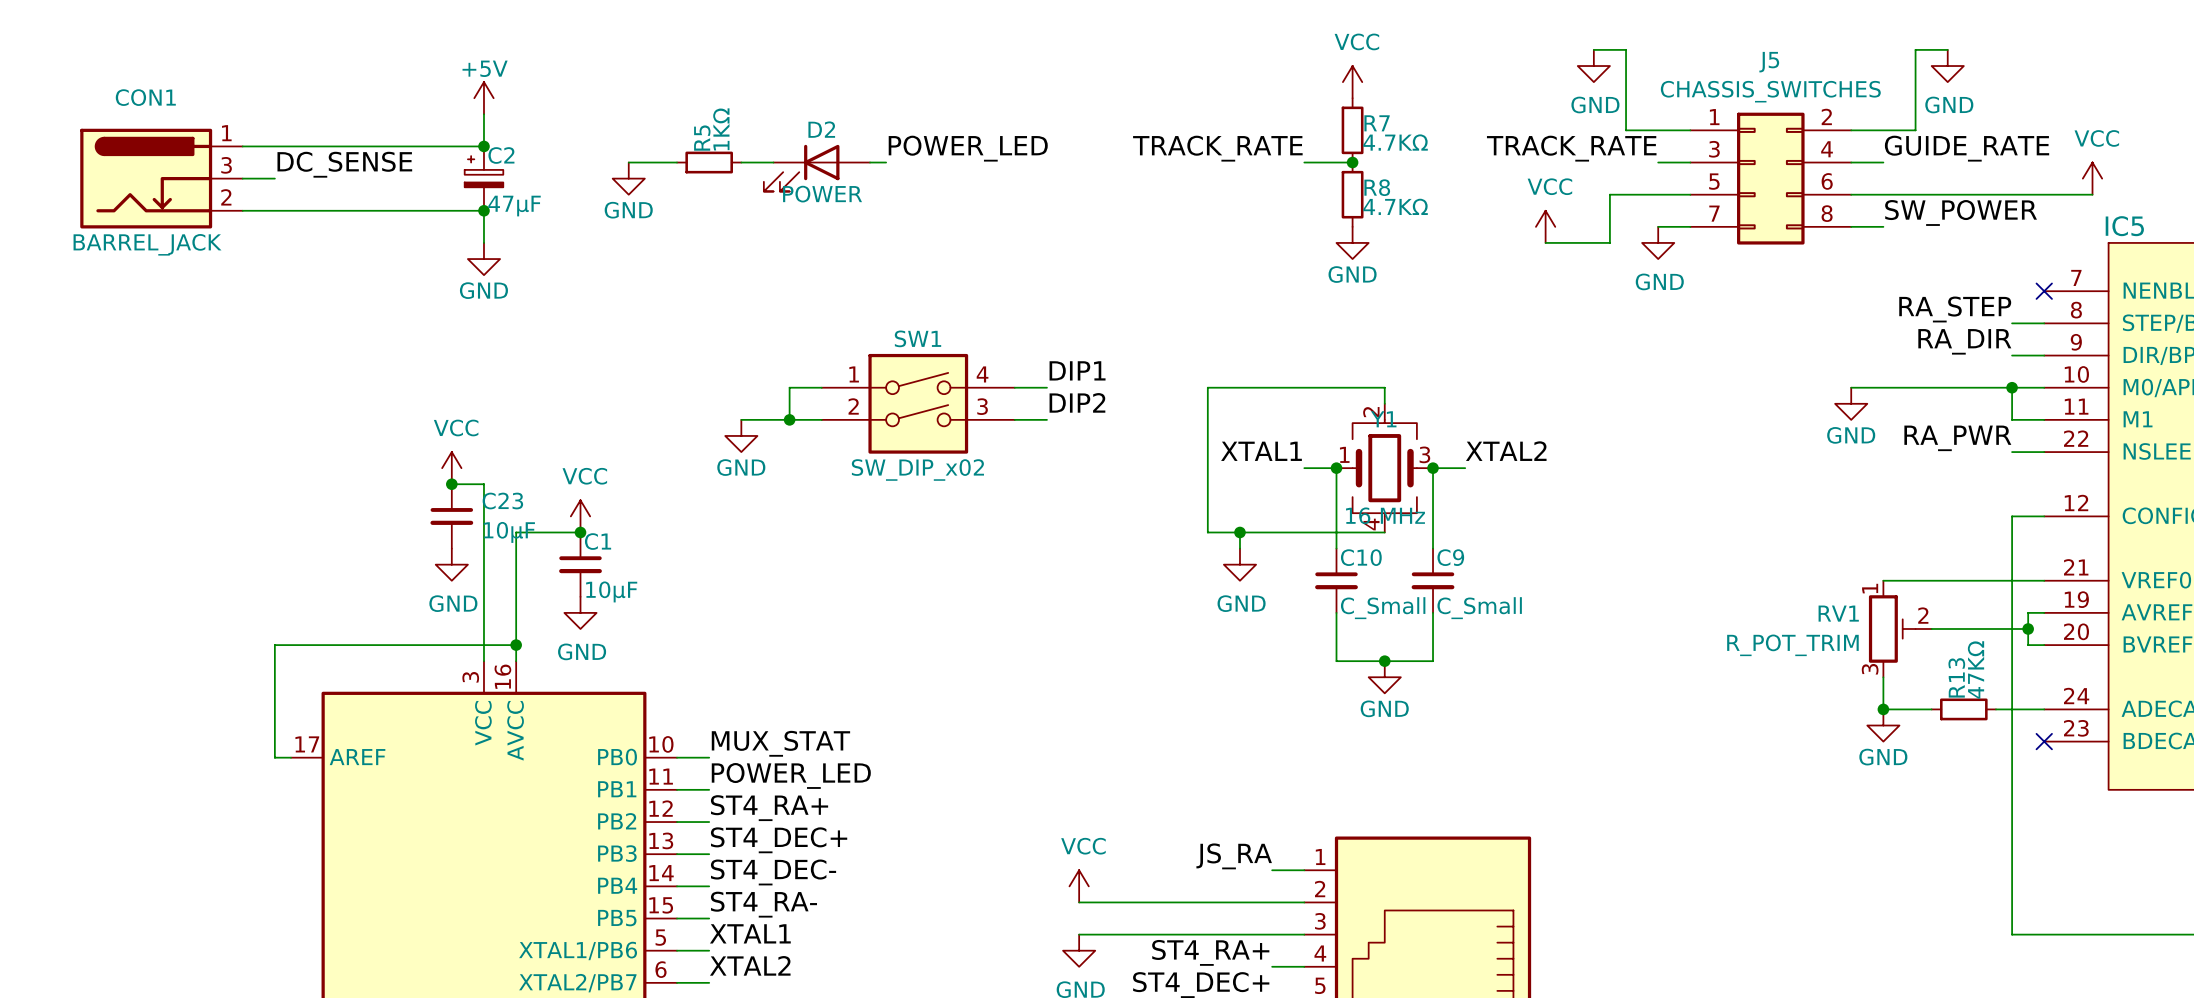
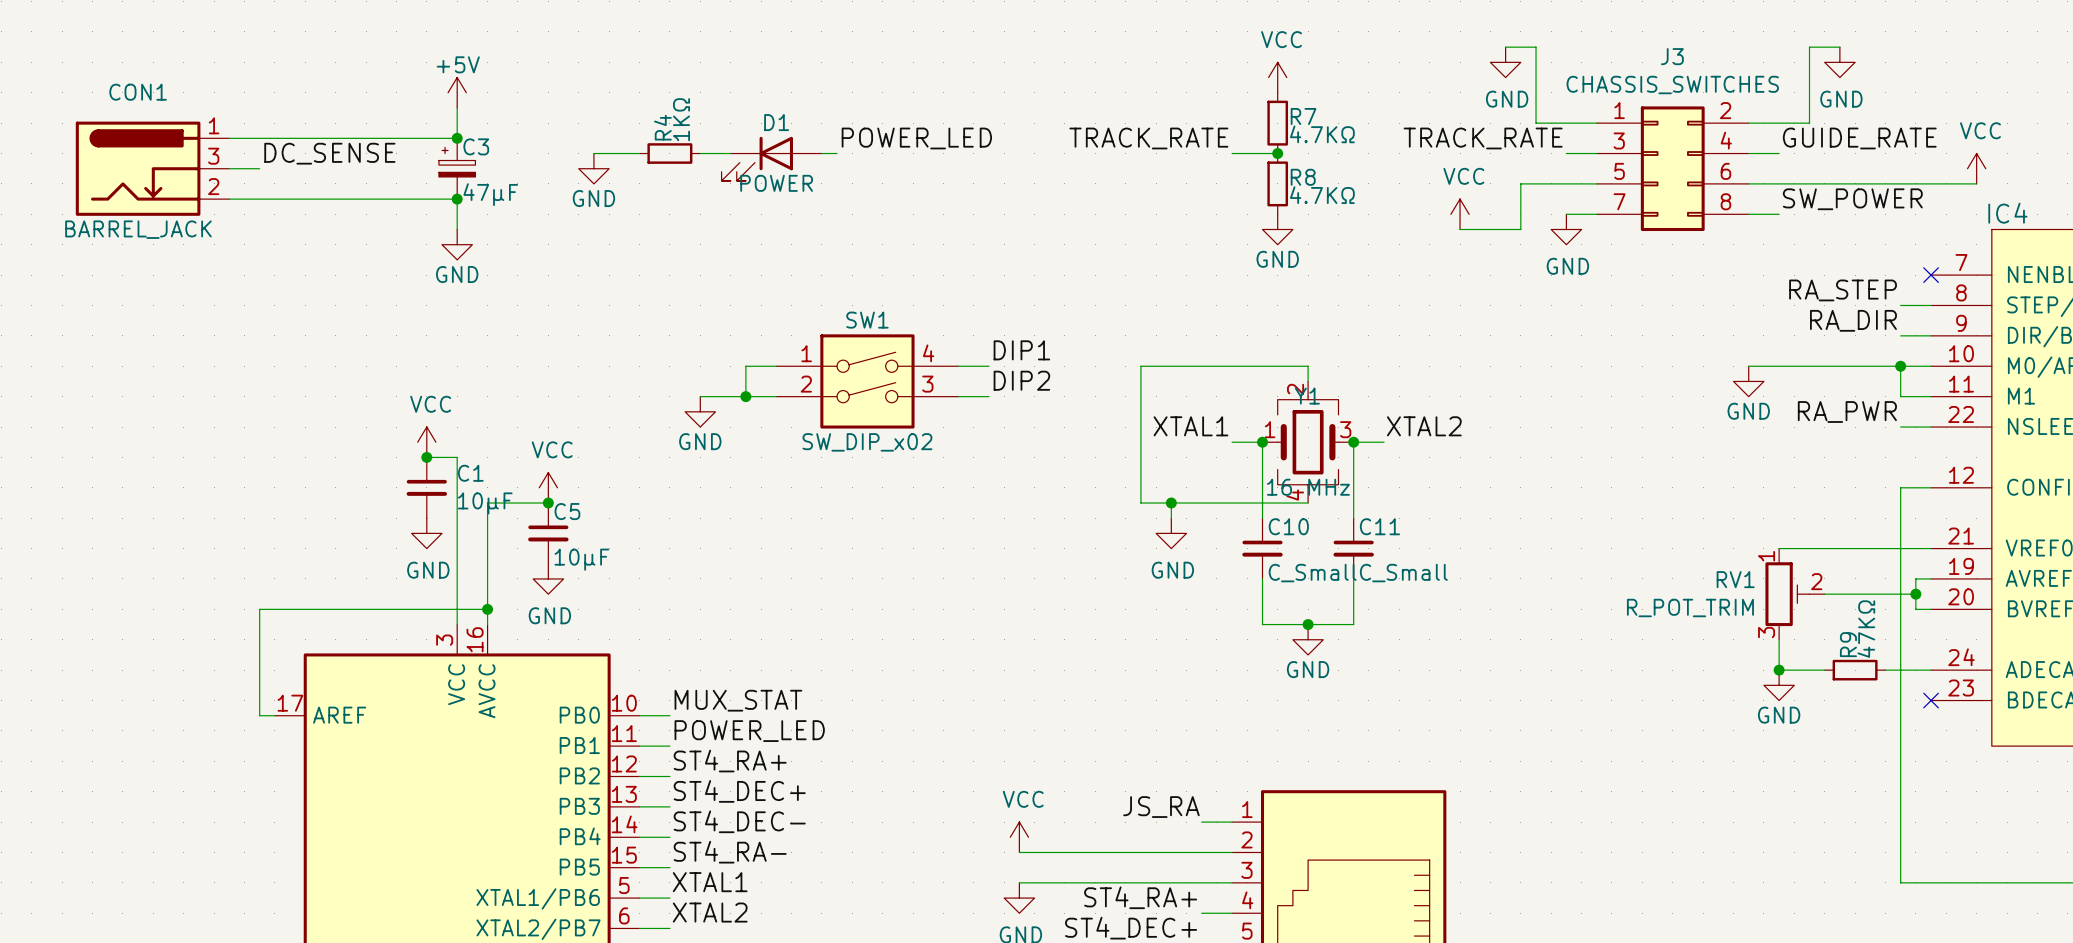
J5 name: J5 (1769, 62) -> J3 (1672, 56)
D2 name: D2 (821, 129) -> D1 (776, 122)
R5 name: R5 (702, 138) -> R4 (662, 127)
C2 name: C2 (501, 155) -> C3 (476, 146)
IC5 name: IC5 (2124, 226) -> IC4 (2007, 213)
C23 name: C23 (502, 501) -> C1 (470, 473)
C1 name: C1 (598, 541) -> C5 (567, 511)
C9 name: C9 (1450, 557) -> C11 (1379, 526)
R13 name: R13 (1956, 677) -> R9 (1848, 644)

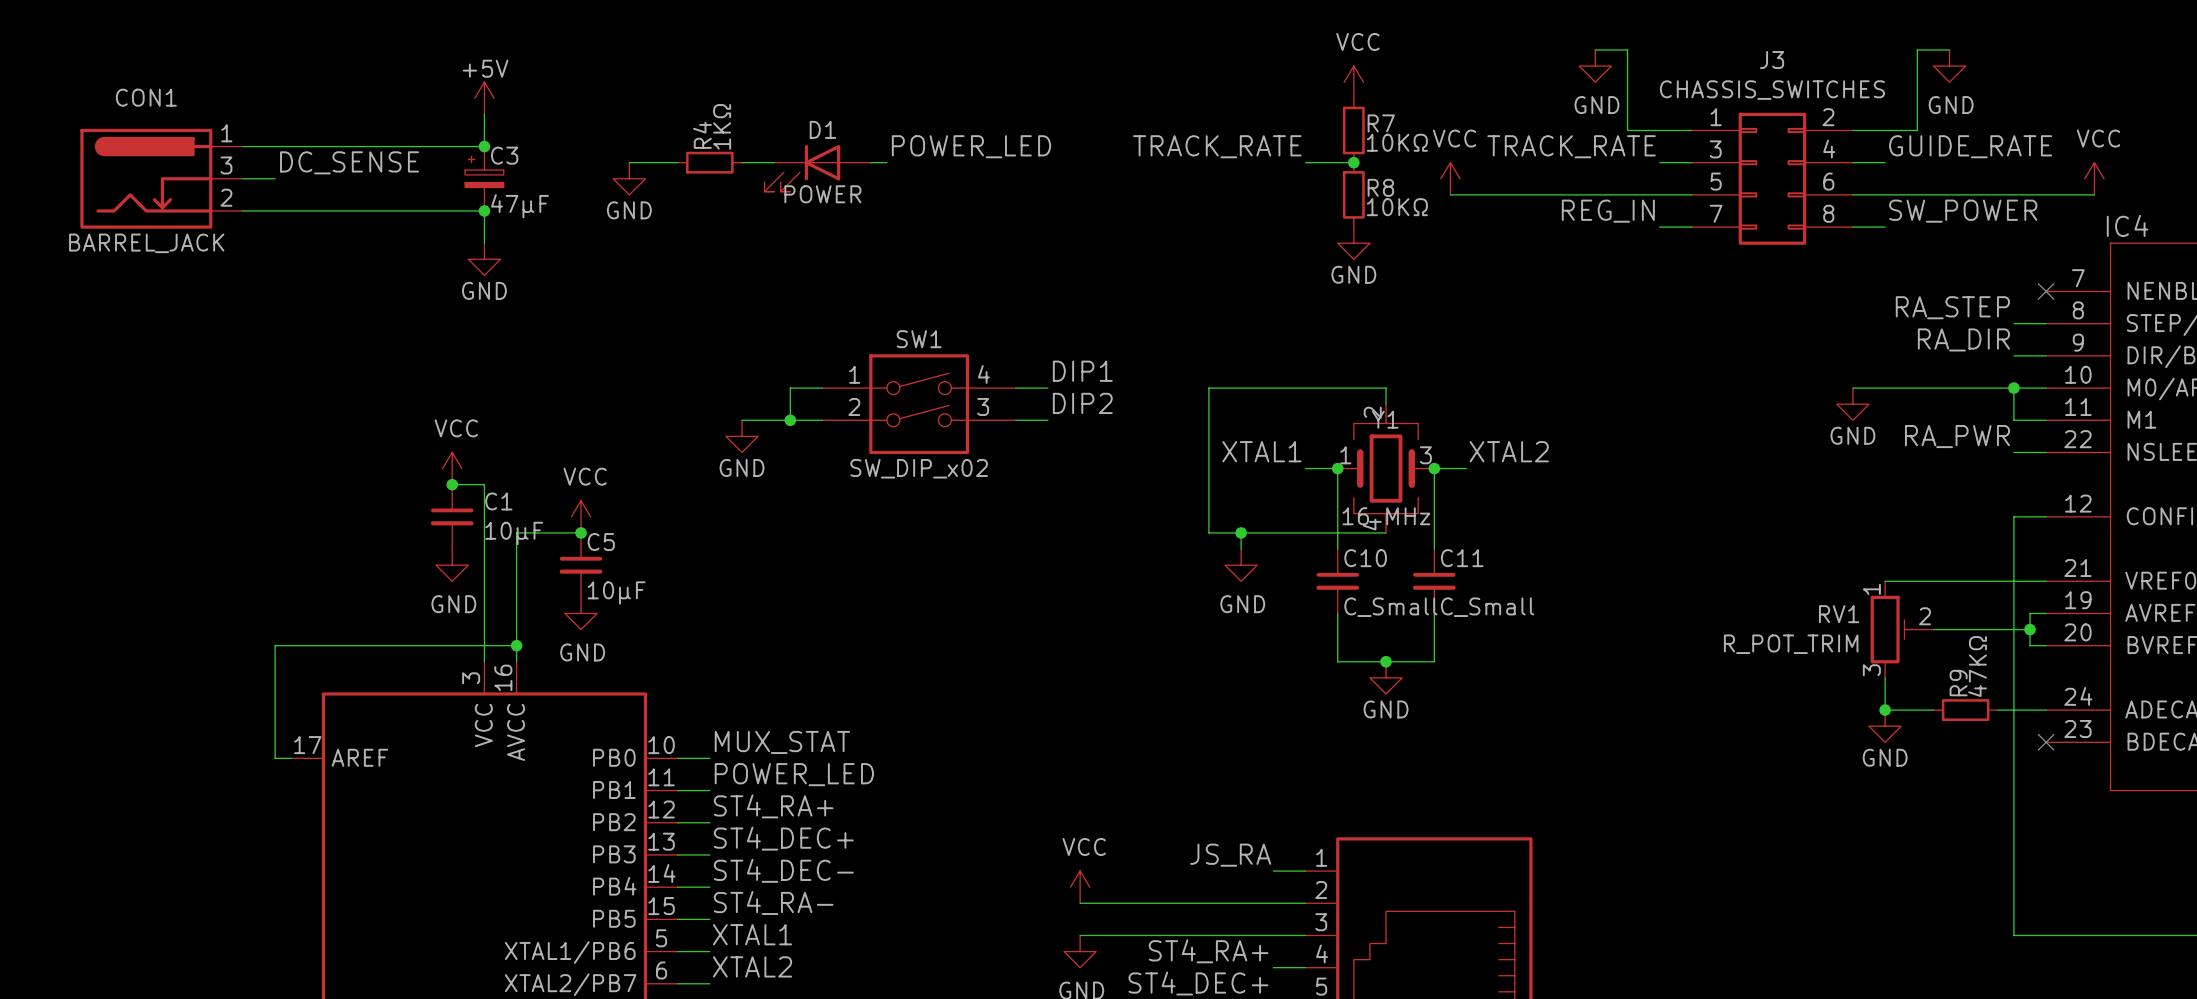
R7 value: 4.7KΩ (1322, 134) -> 10KΩ (1397, 142)
wire: (1520, 183) (1520, 229) (1460, 229) -> (1611, 194) (1450, 194)
R8 value: 4.7KΩ (1322, 195) -> 10KΩ (1397, 207)
label: none -> REG_IN (1608, 211)
power symbol position: VCC (1460, 214) -> VCC (1450, 178)
power symbol: GND (1566, 229) -> none

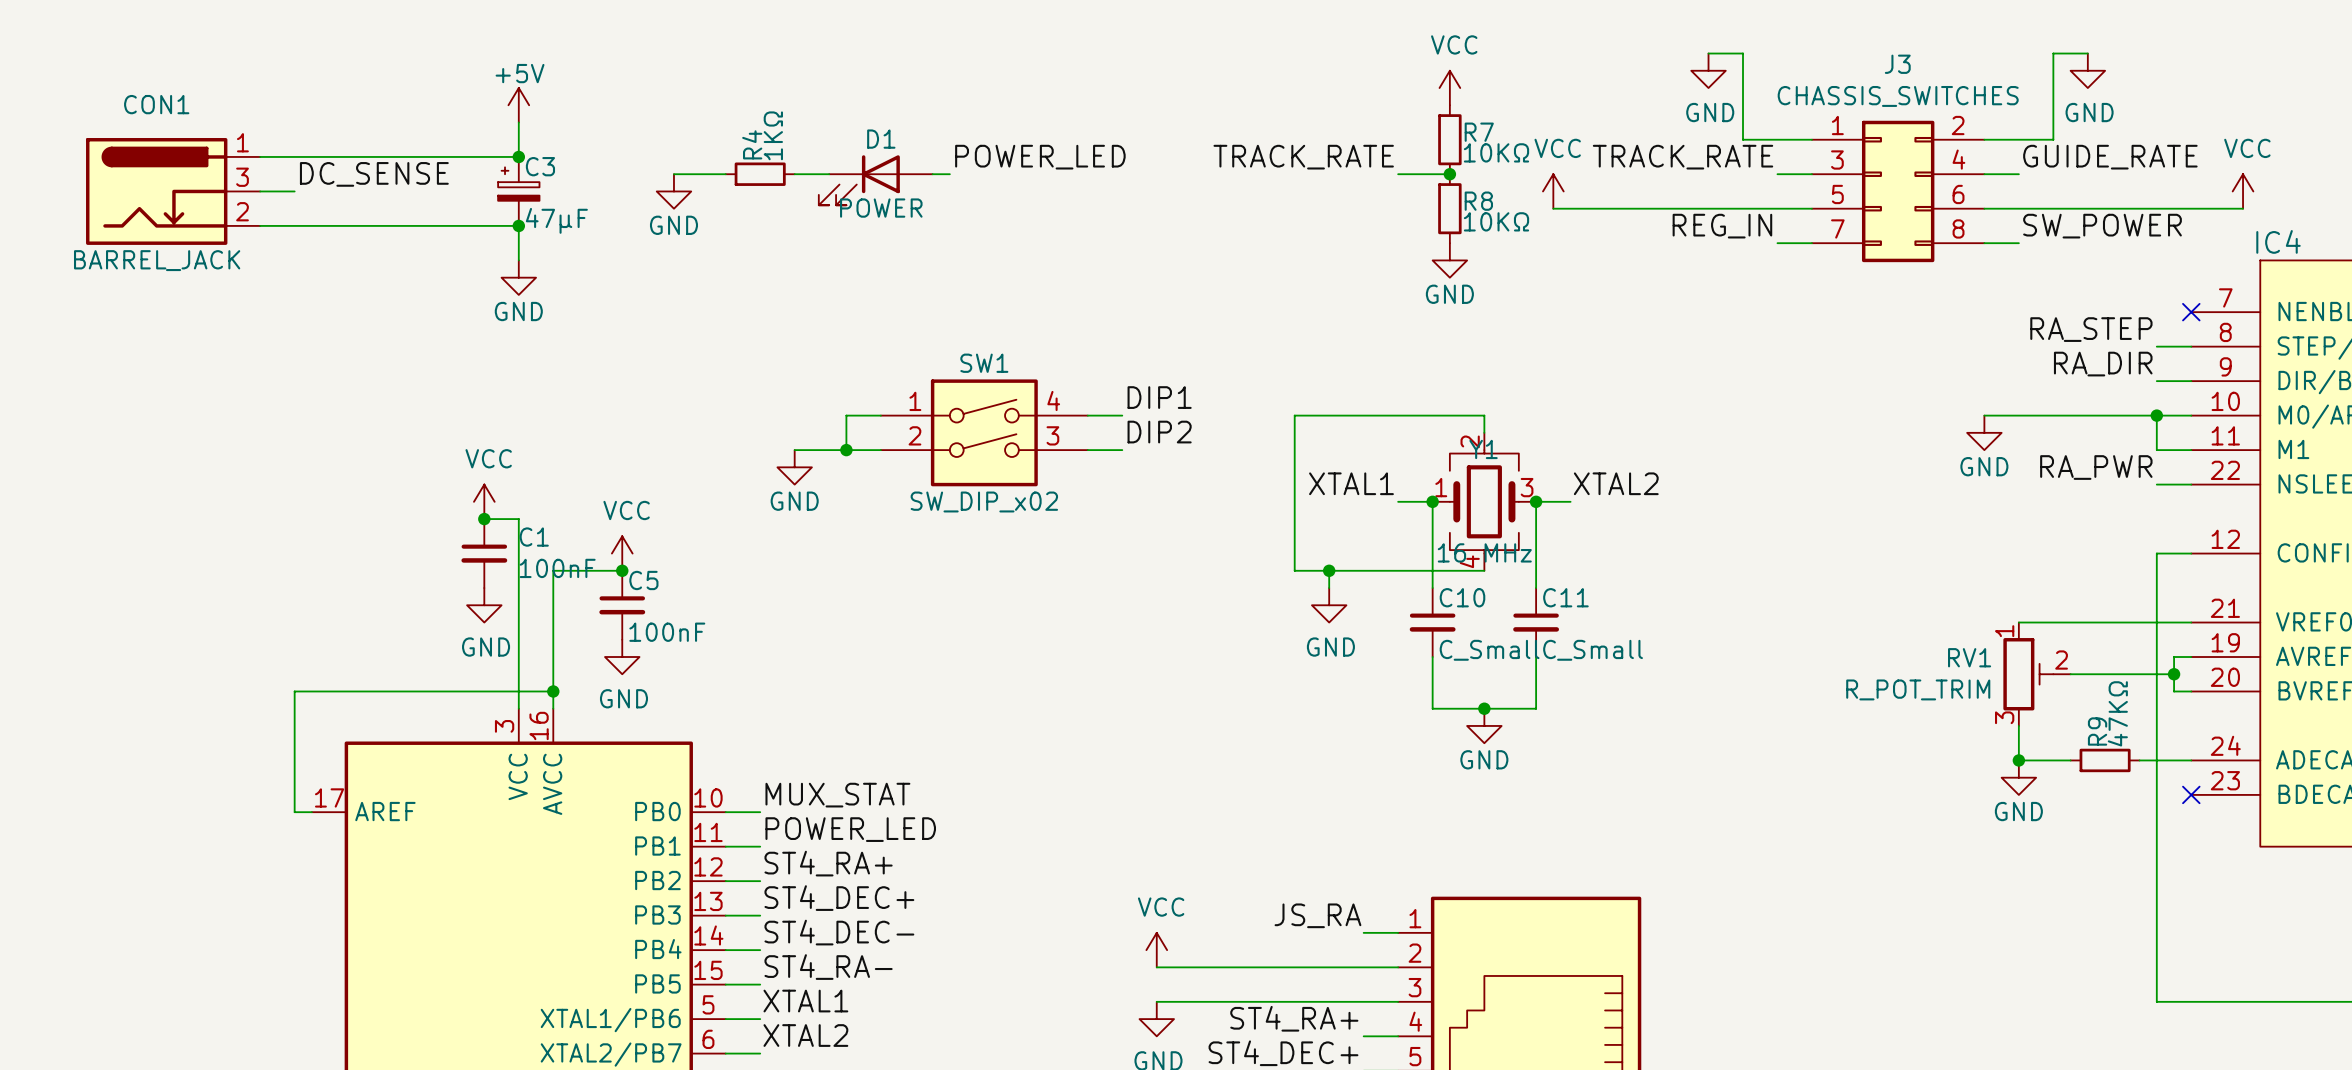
C1 value: 10µF (514, 533) -> 100nF (557, 568)
C5 value: 10µF (616, 593) -> 100nF (667, 632)

